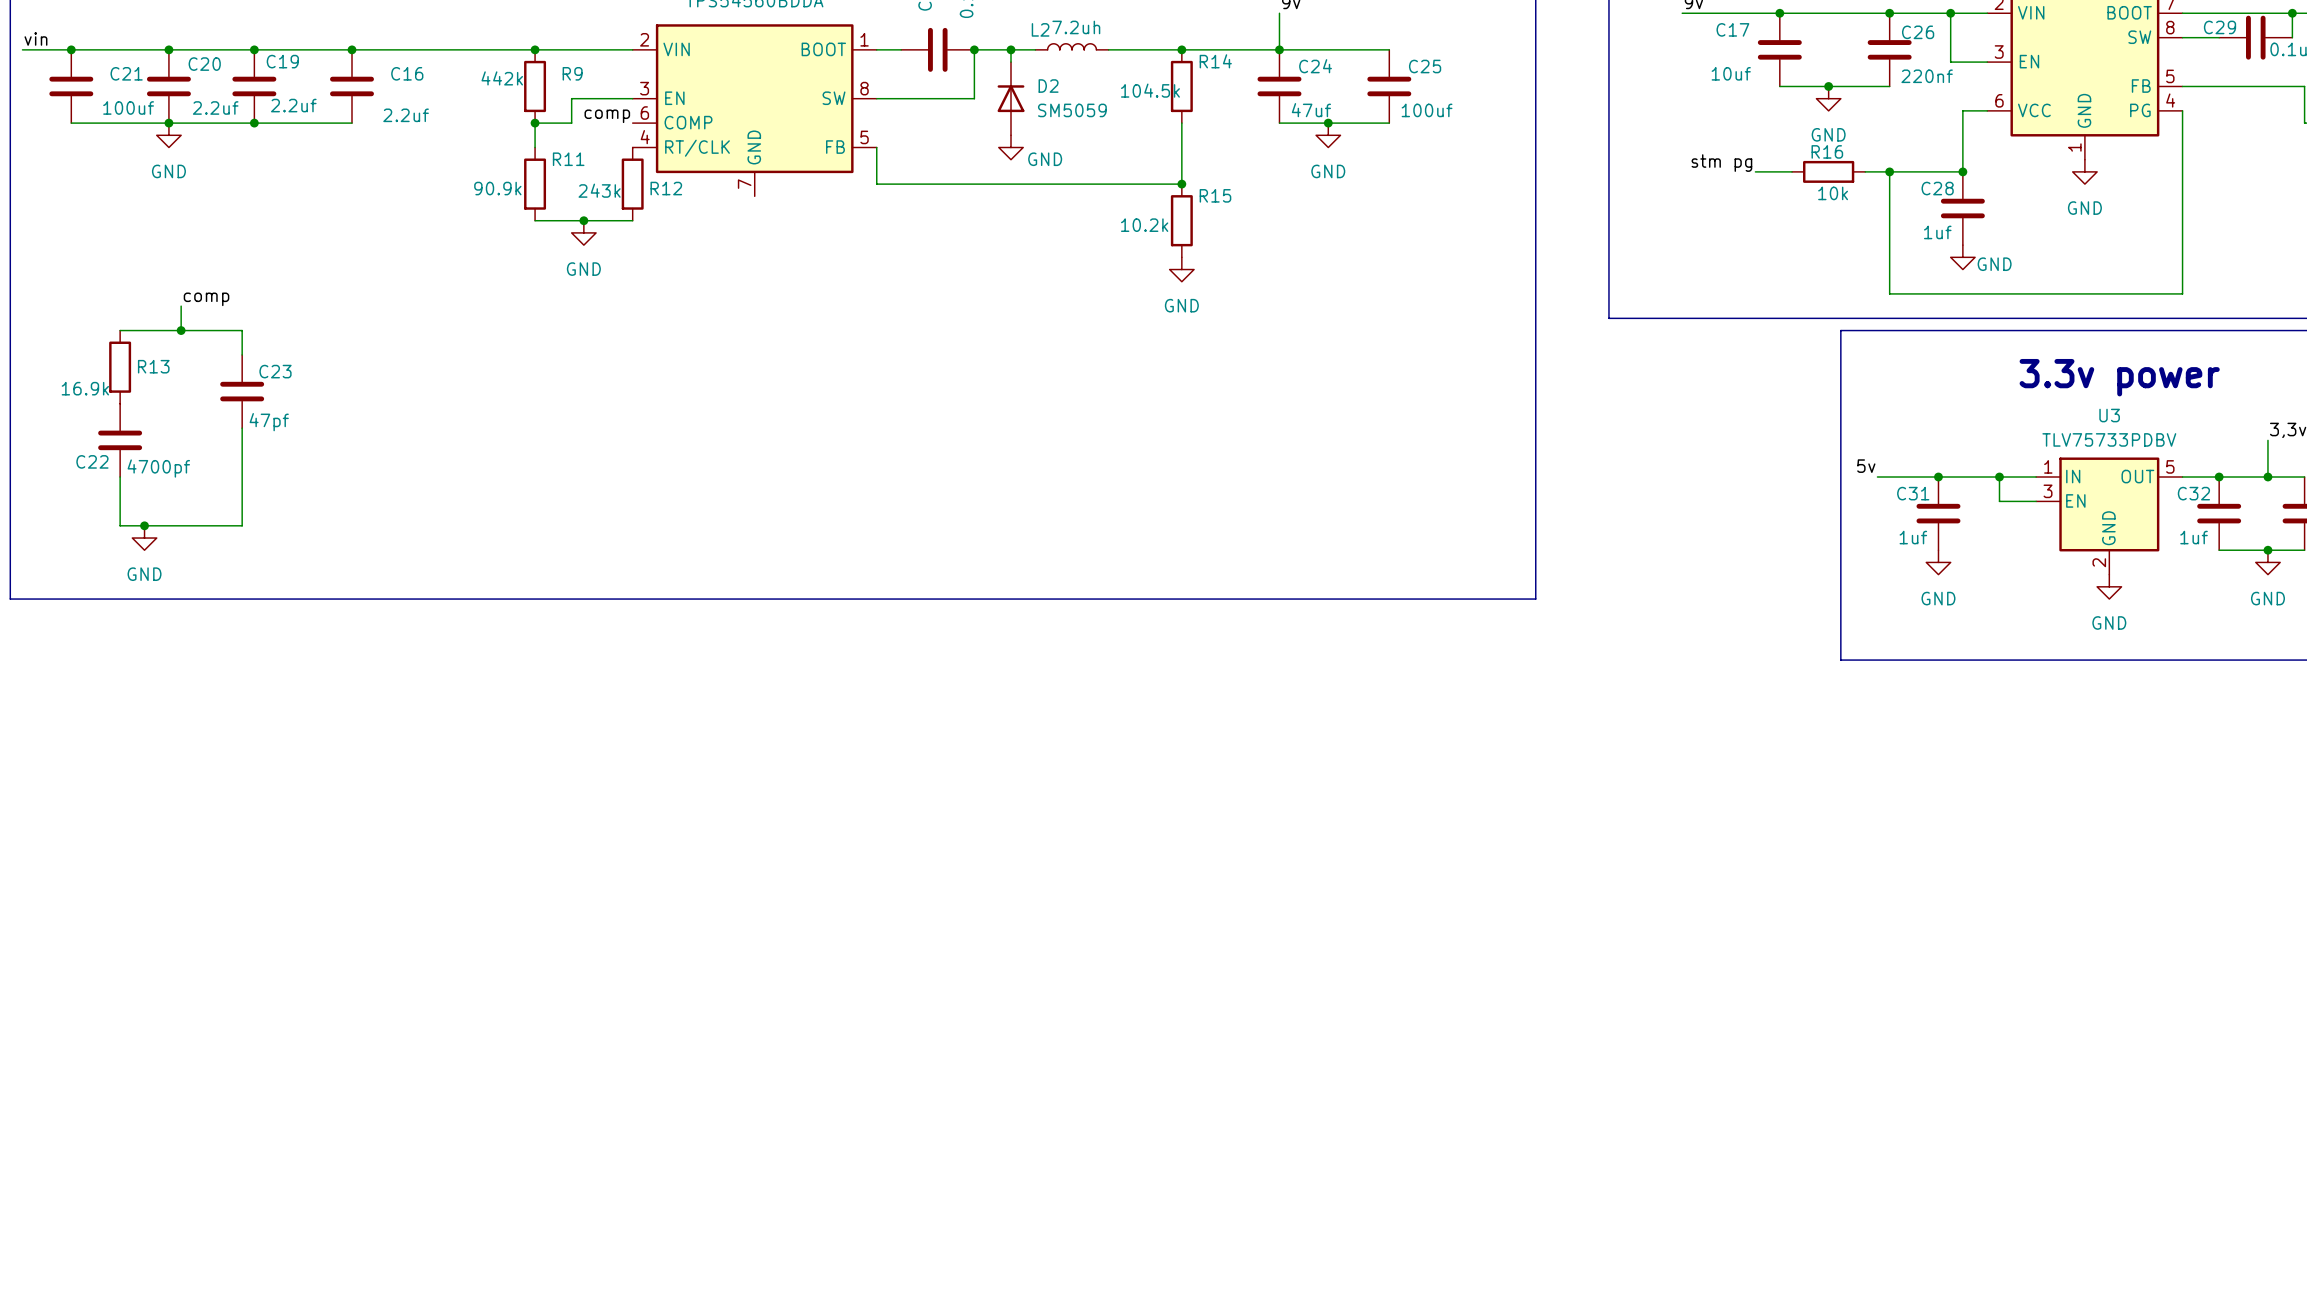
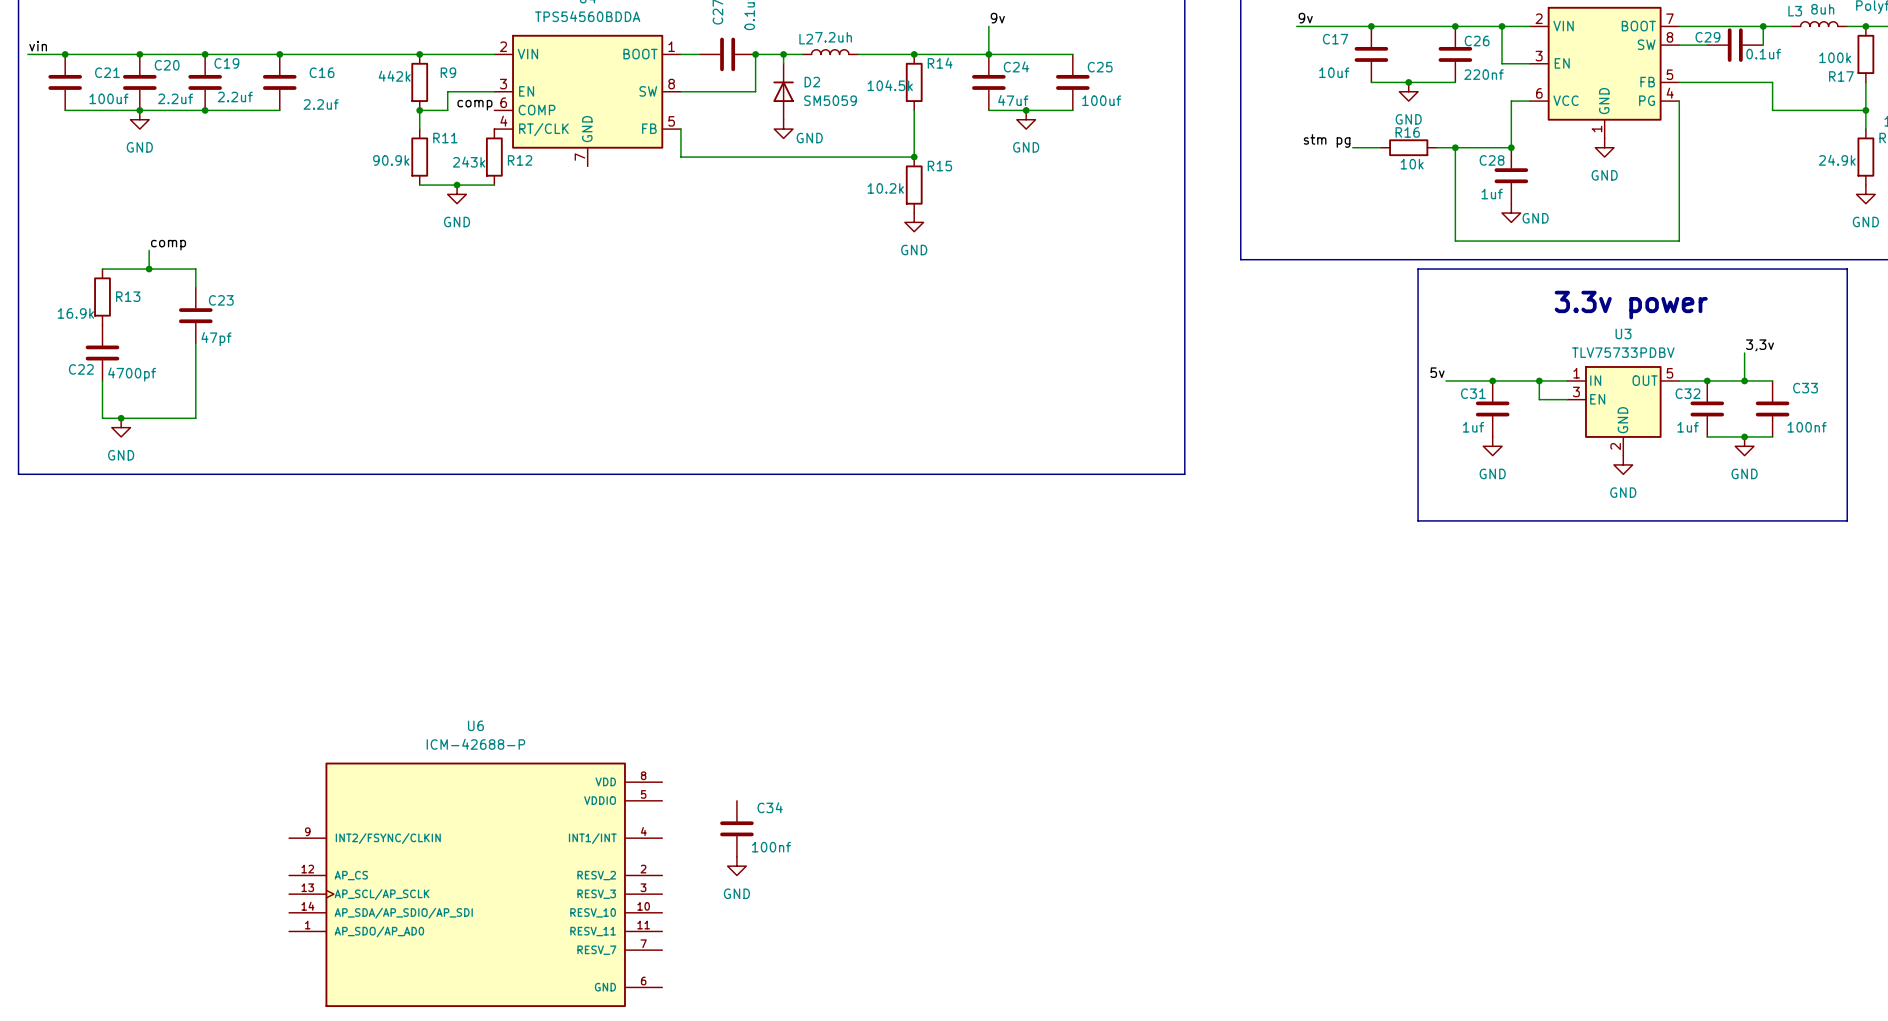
C34: none -> 100nf (736, 828)
power symbol: none -> GND (736, 866)
U6: none -> ICM-42688-P (475, 884)

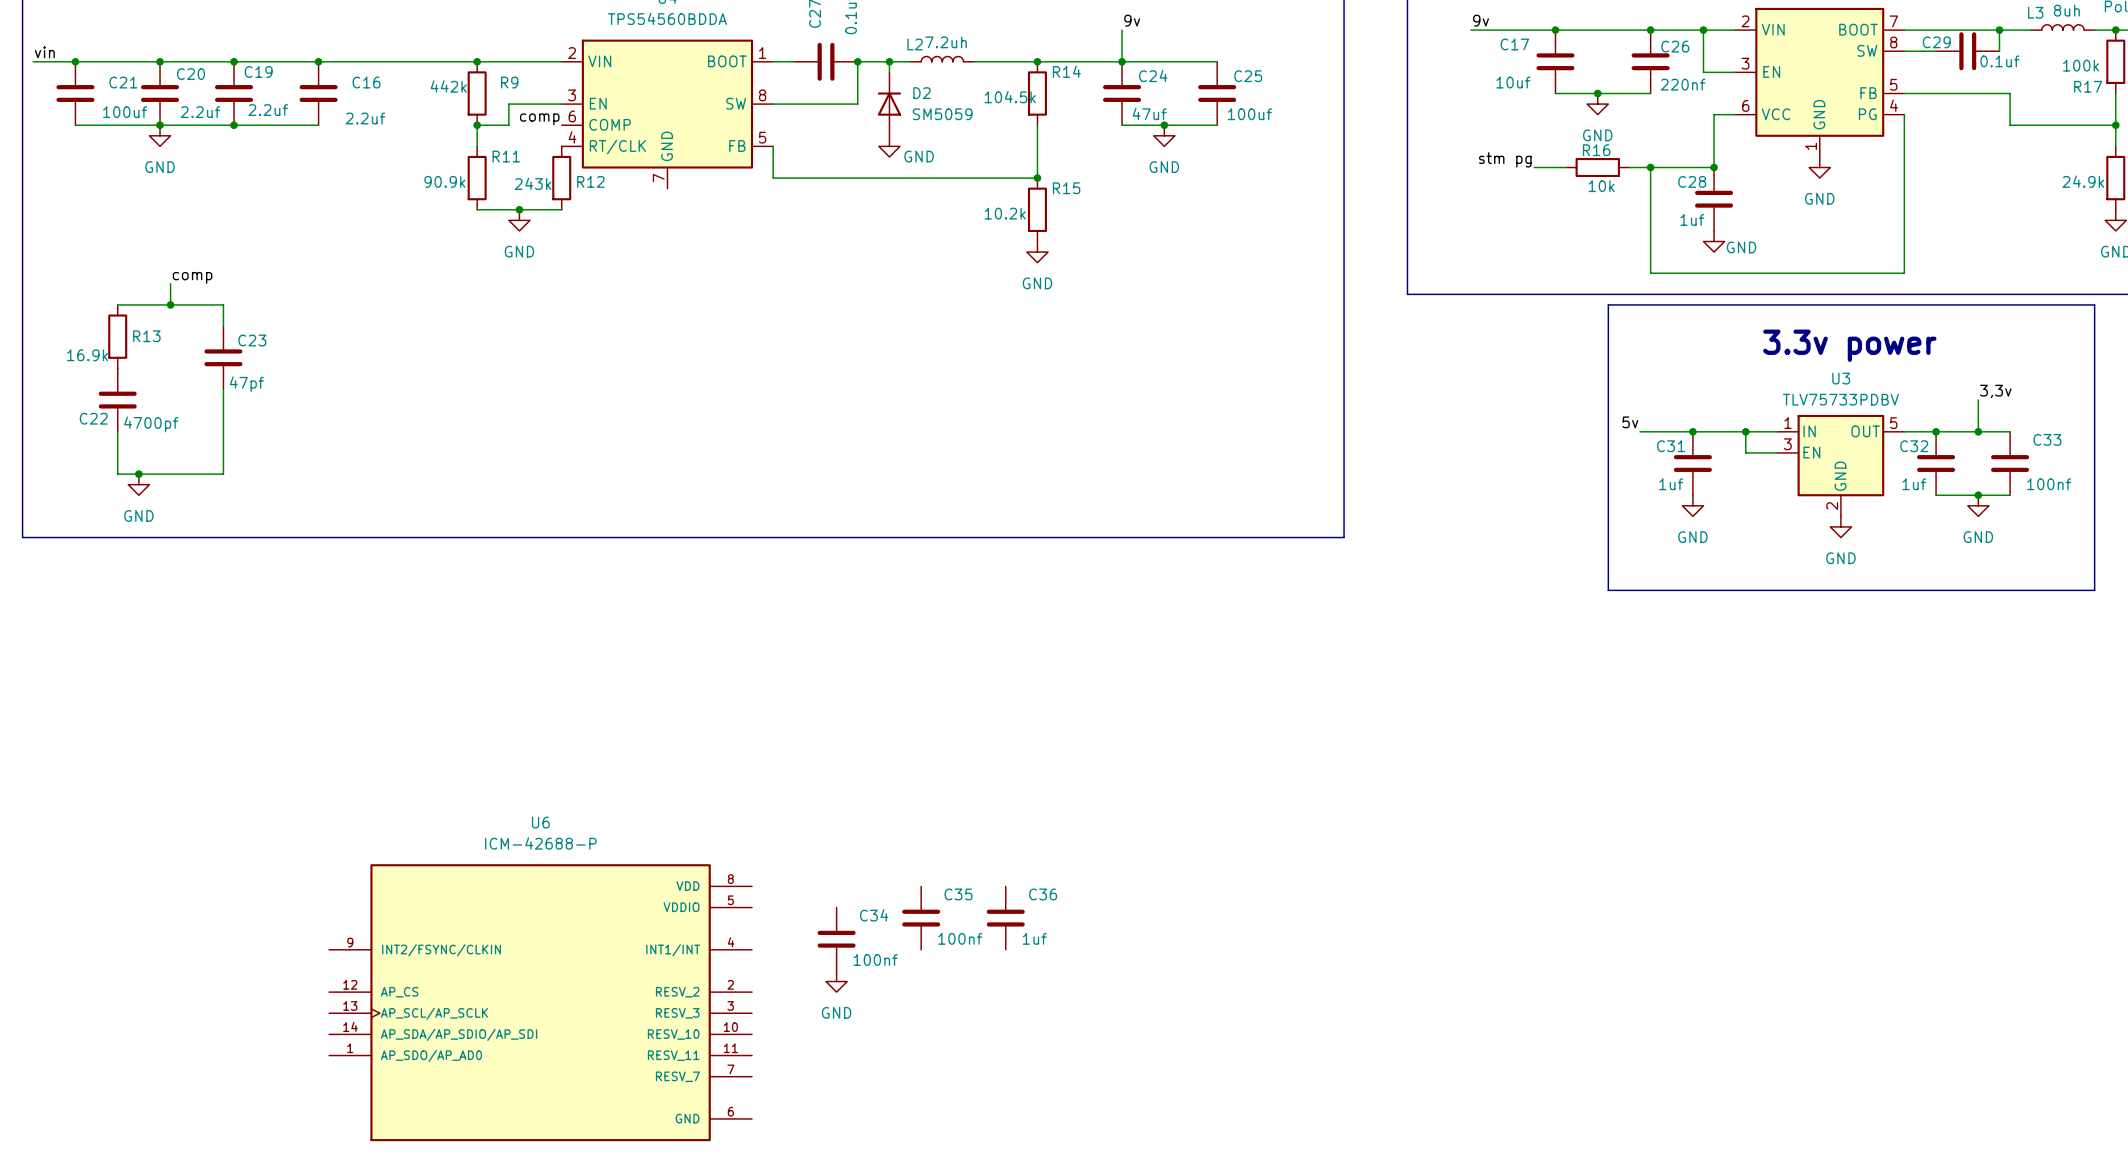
C35: none -> 100nf (921, 918)
C36: none -> 1uf (1005, 918)

